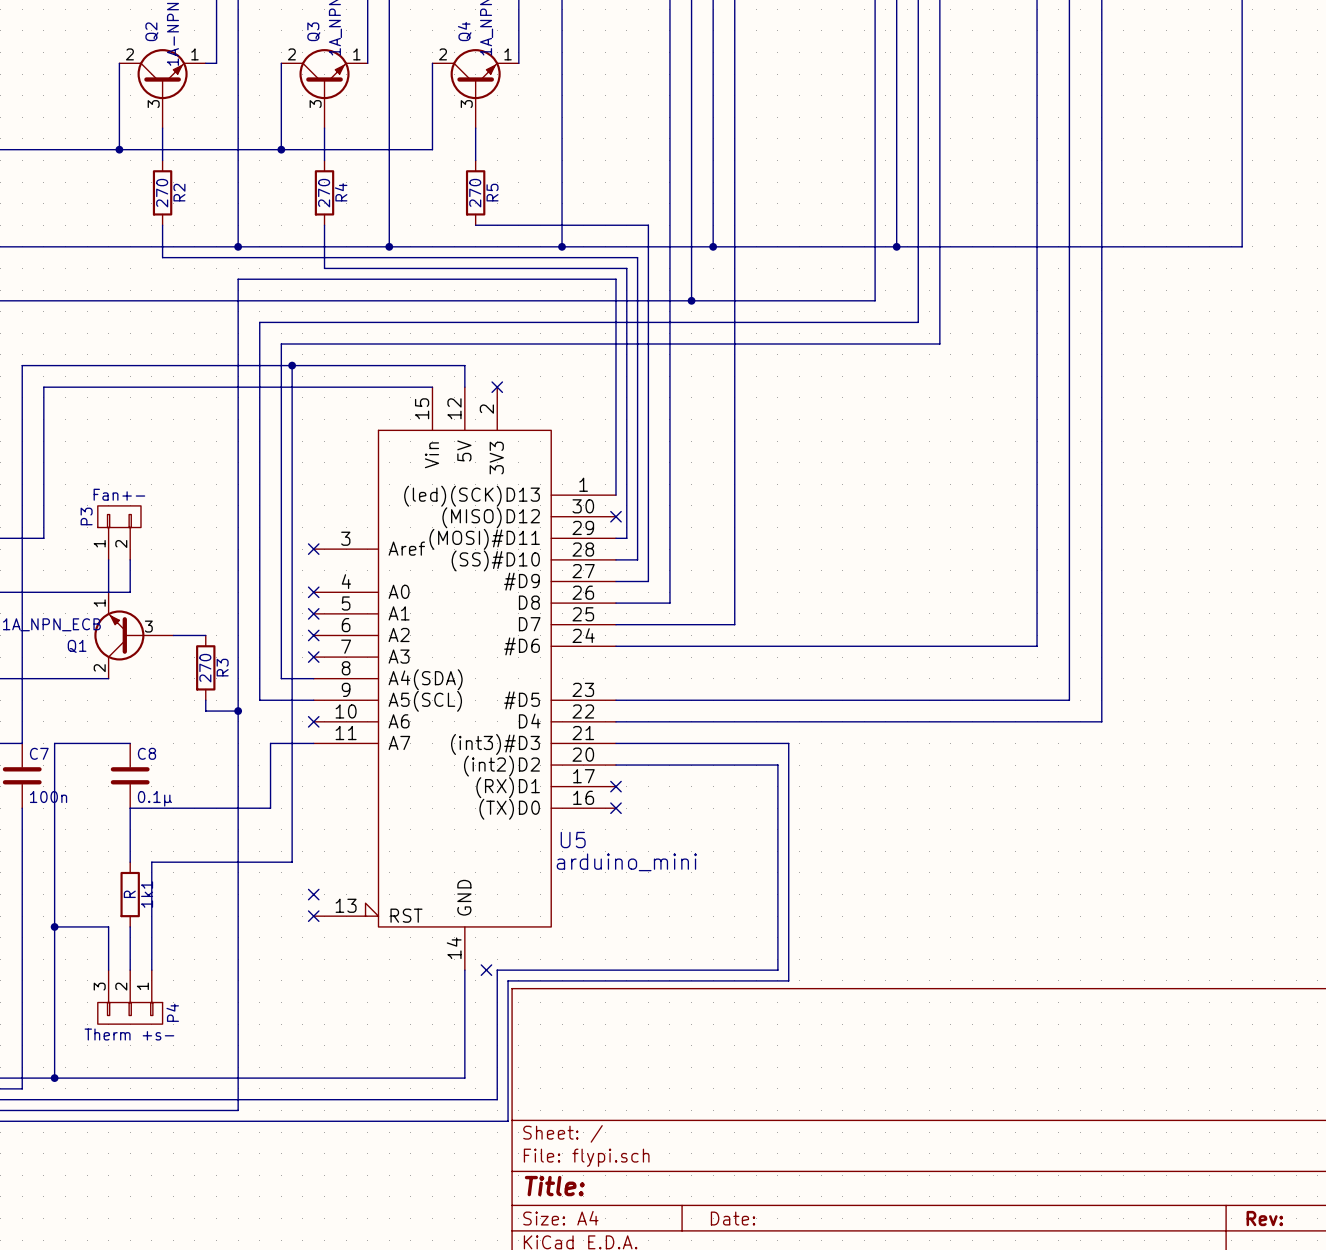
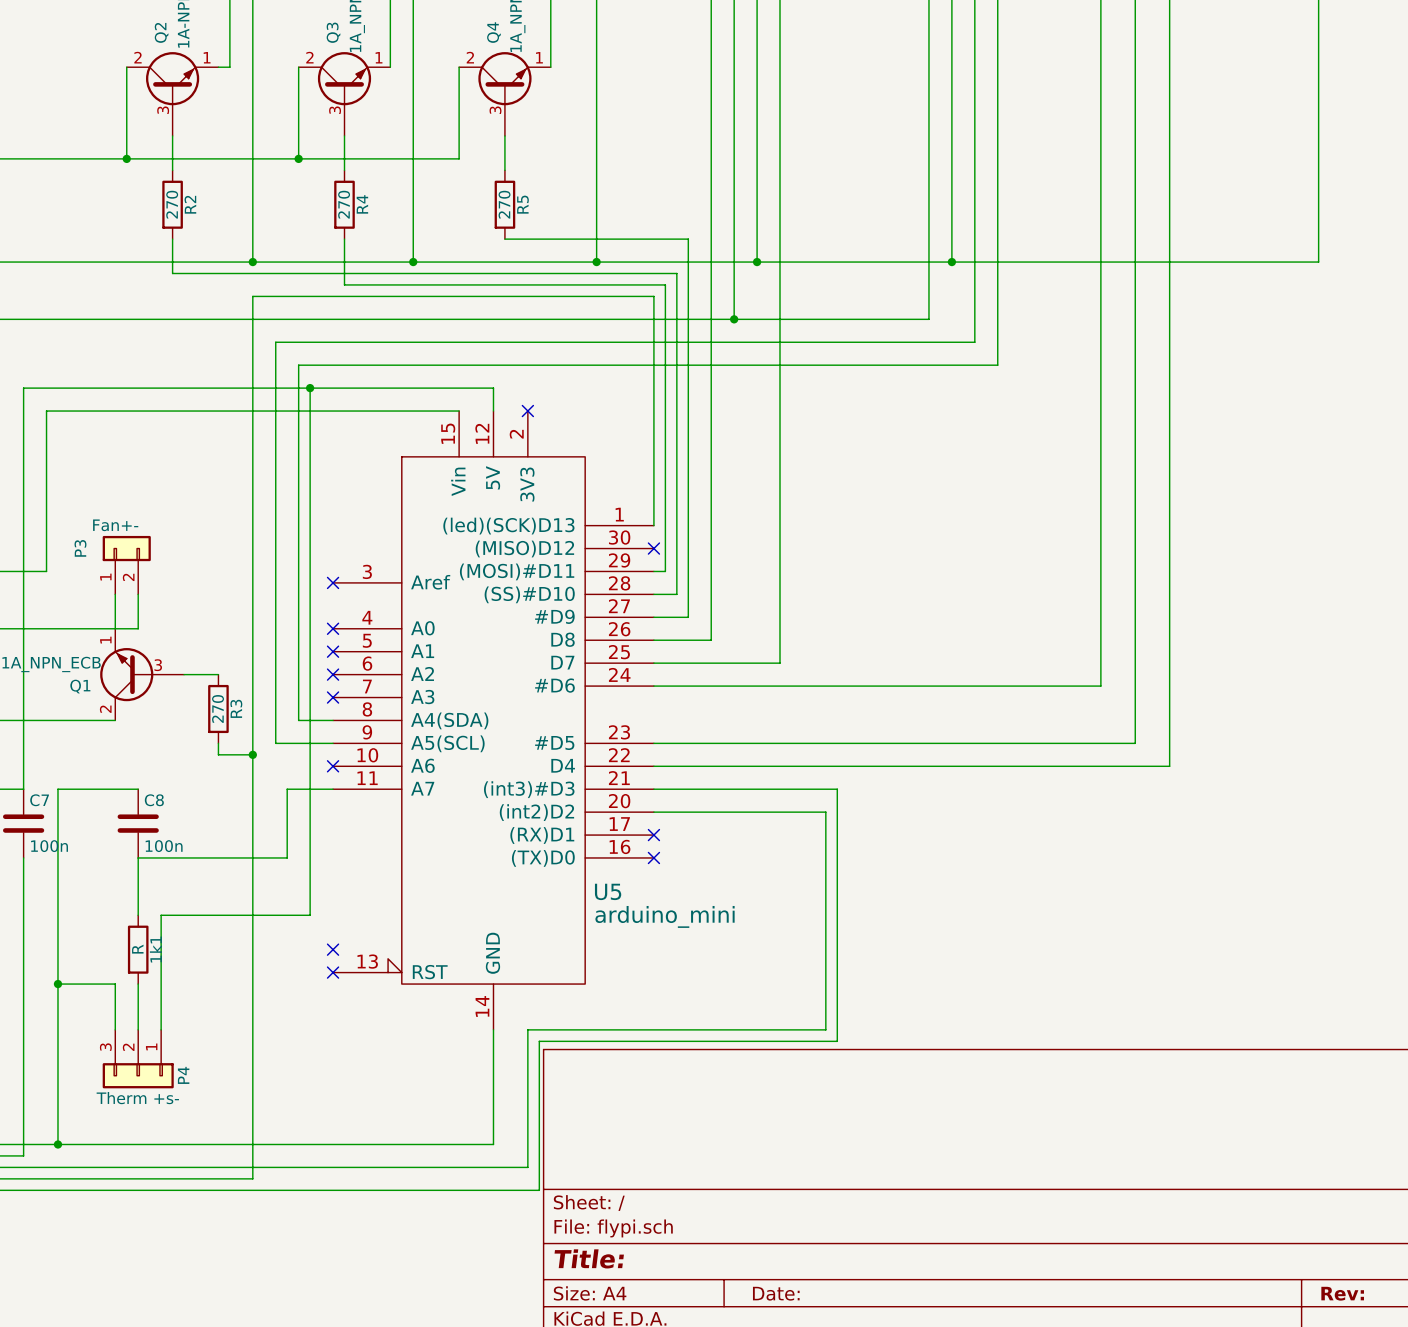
P3 symbol: [97, 505, 141, 560] -> [102, 535, 151, 595]
C8 value: 0.1µ (154, 798) -> 100n (164, 846)
P4 symbol: [97, 970, 163, 1025] -> [102, 1029, 174, 1089]
no-connect mark: (486, 970) -> none

